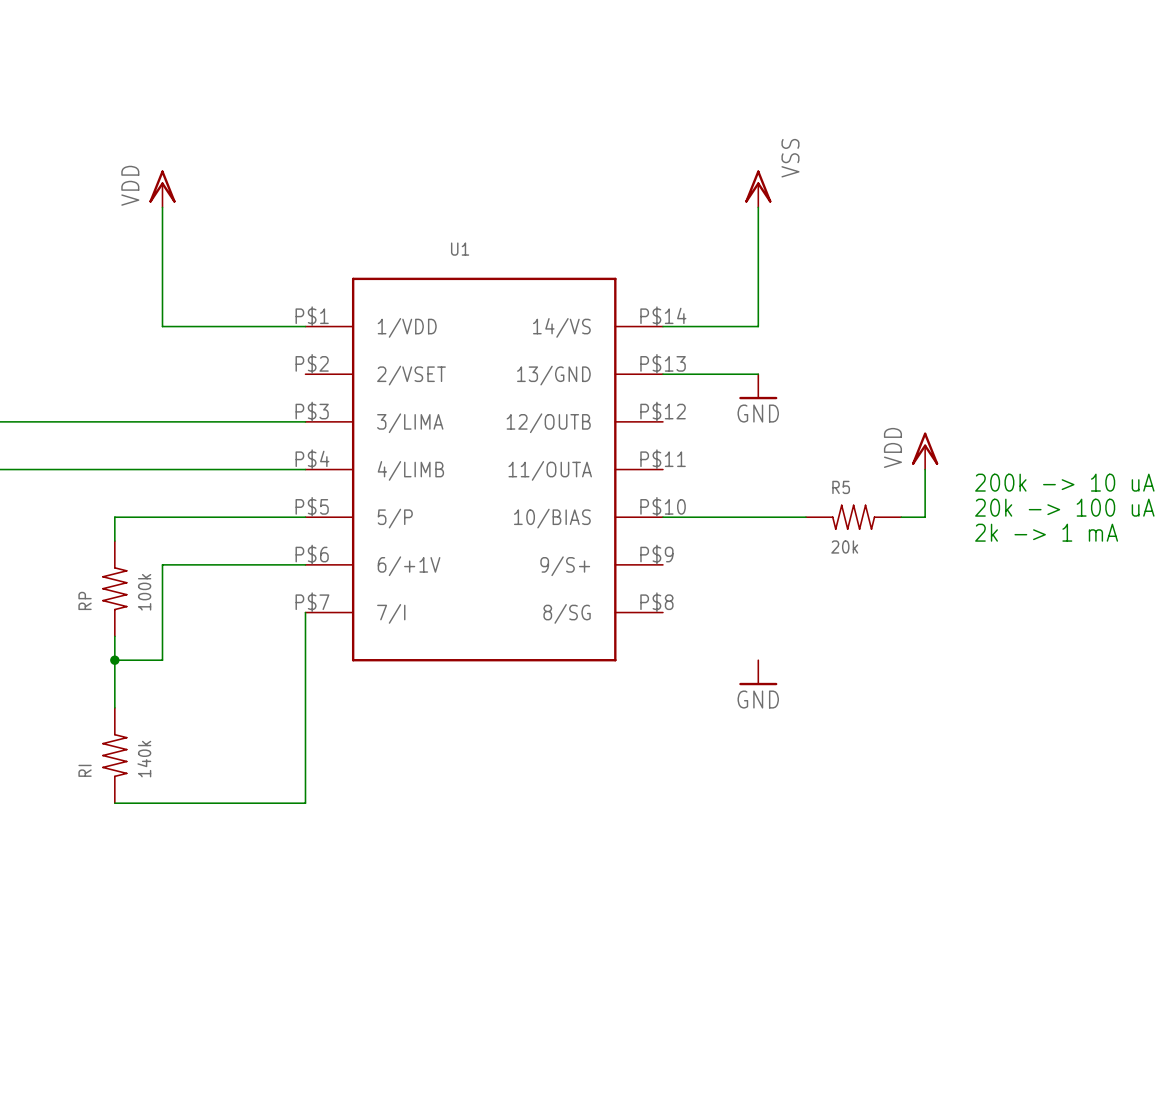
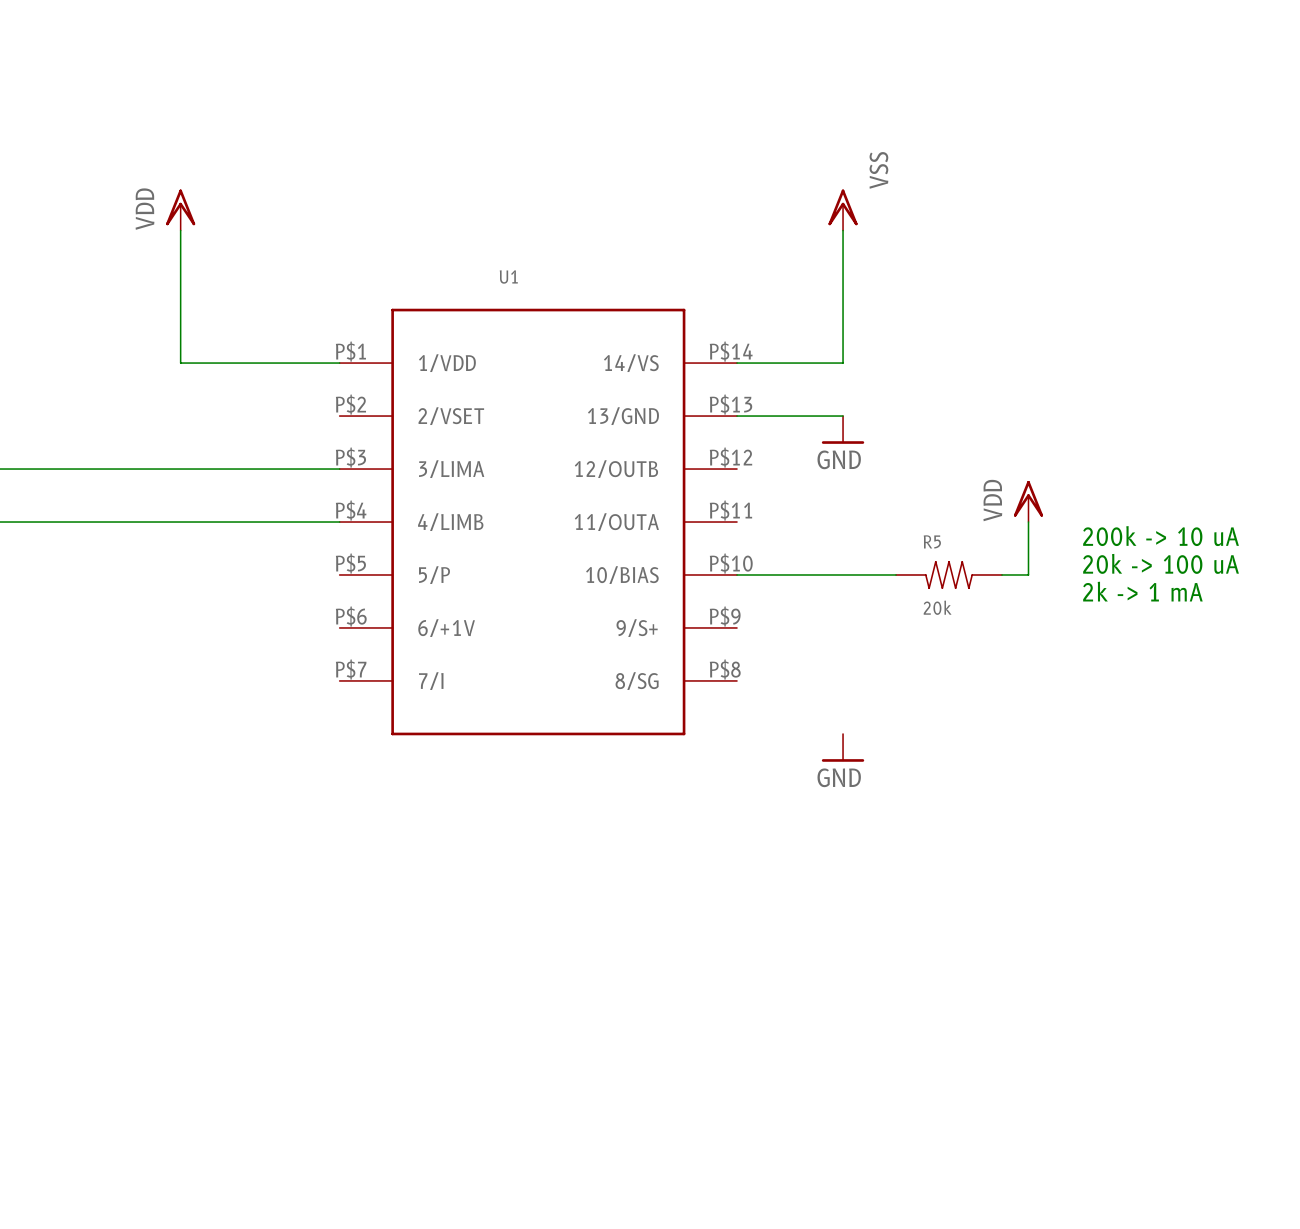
wire: (305, 517) (114, 517) (114, 541) -> none
wire: (305, 564) (162, 564) (162, 660) (114, 660) -> none
RP: 100k (114, 588) -> none
wire: (305, 612) (305, 803) (114, 803) -> none
wire: (114, 636) (114, 707) -> none
junction: (114, 660) -> none
RI: 140k (114, 755) -> none

